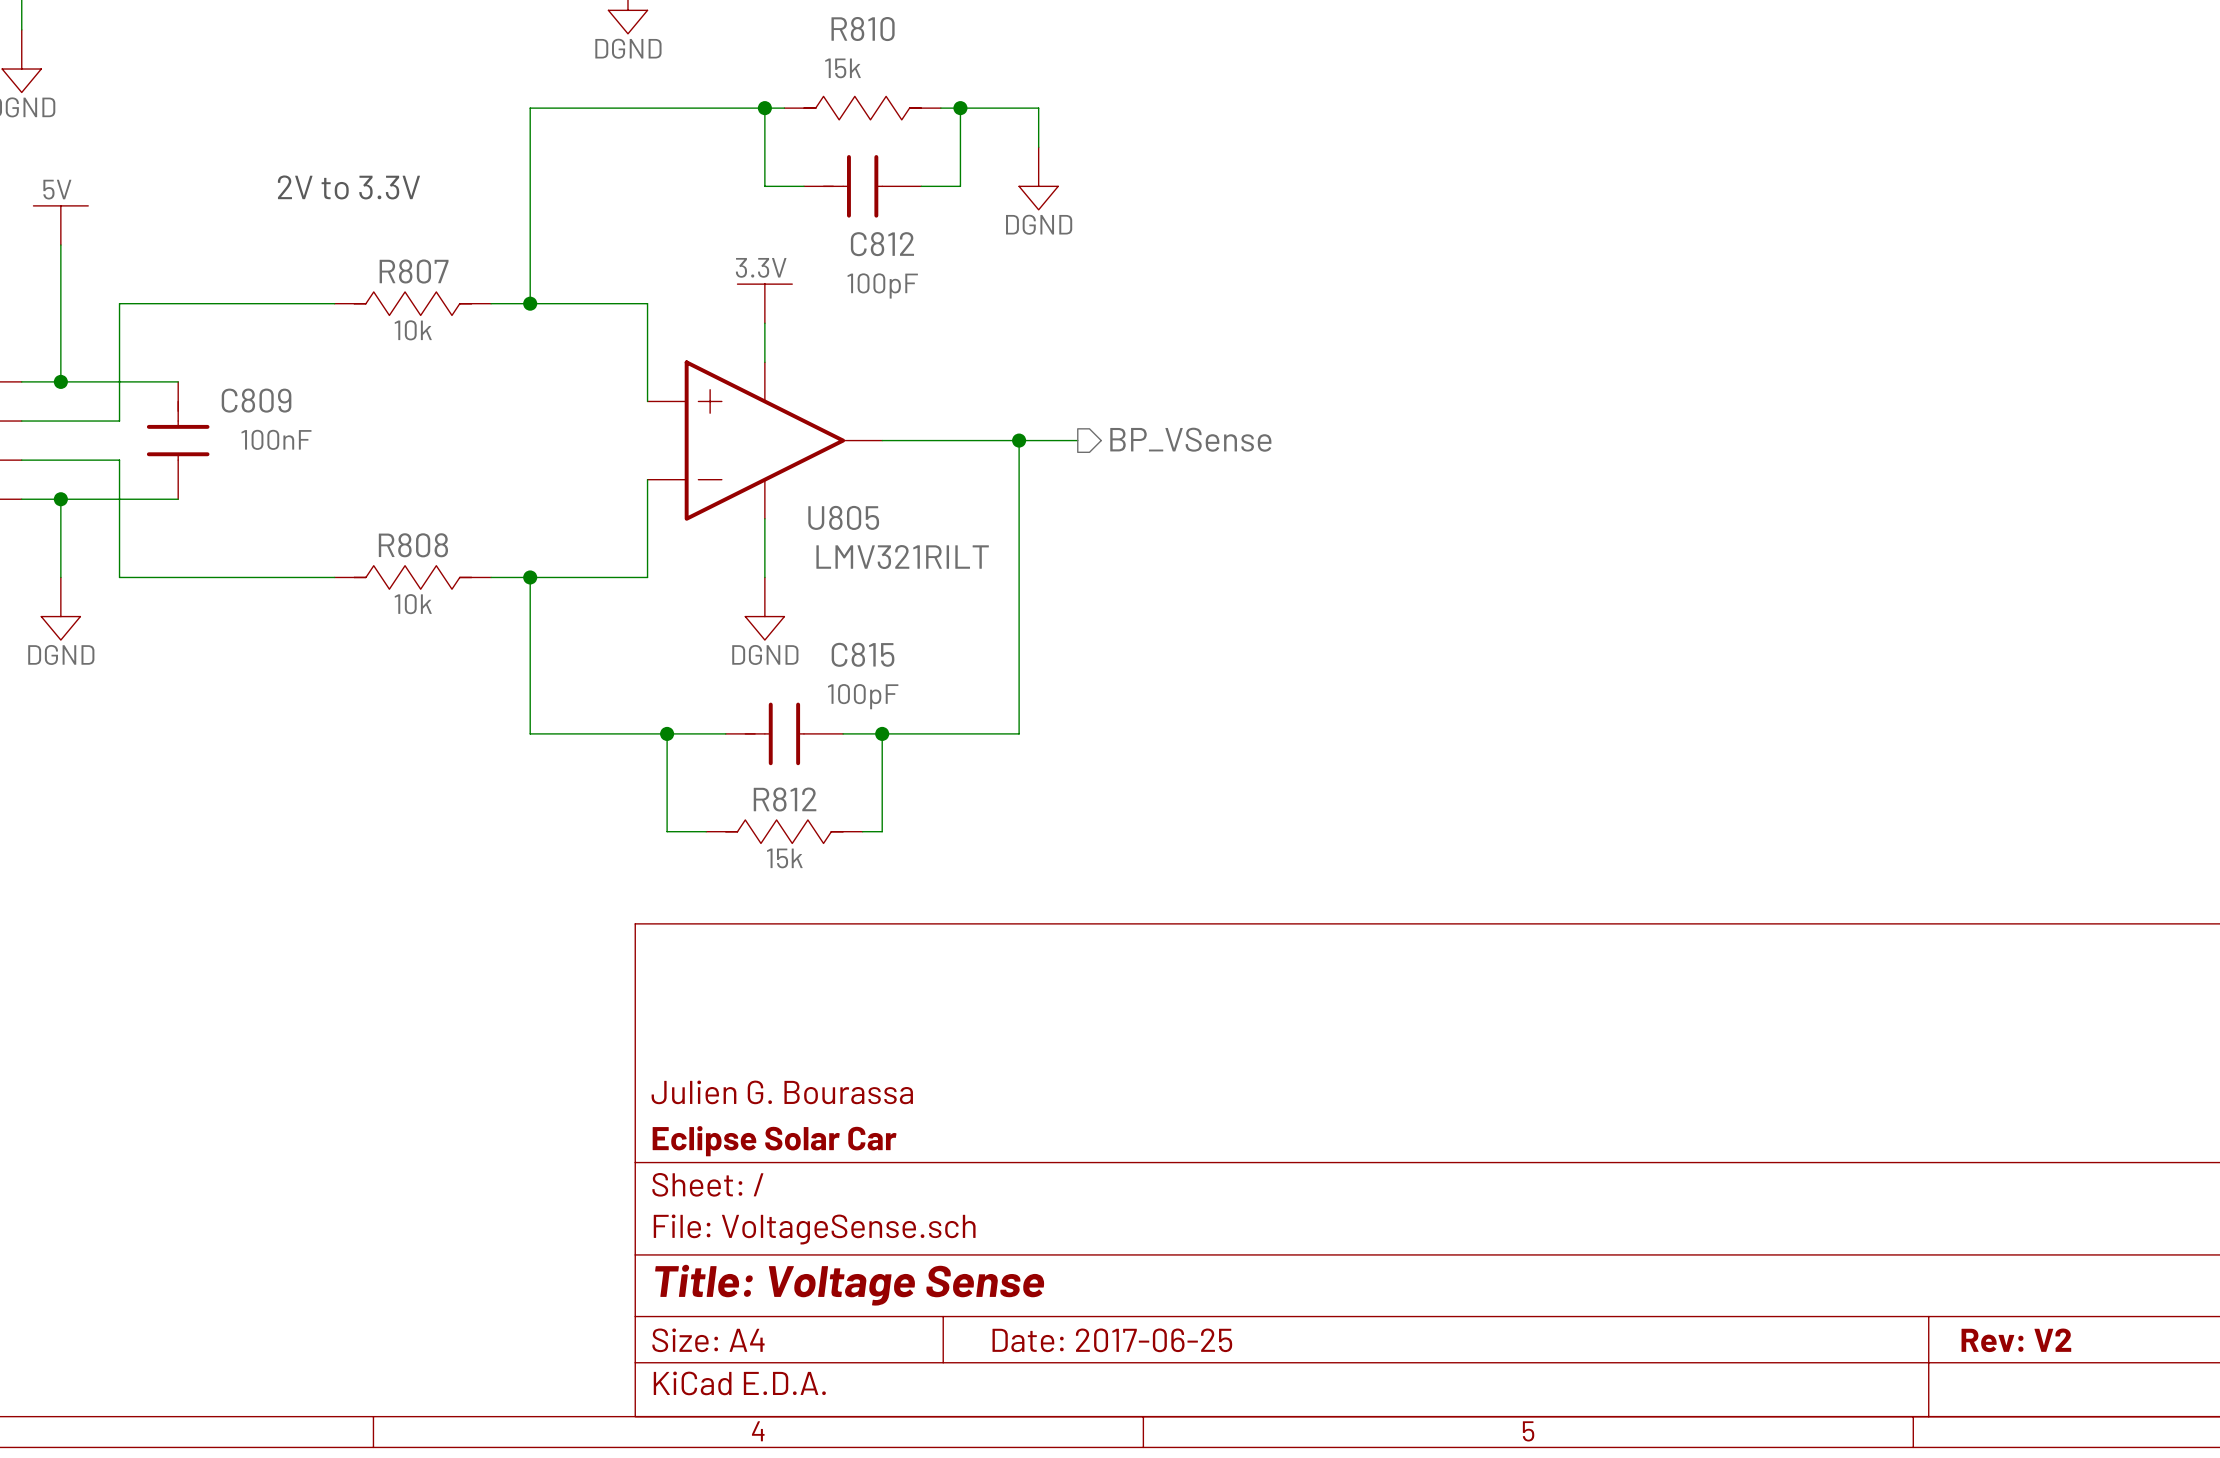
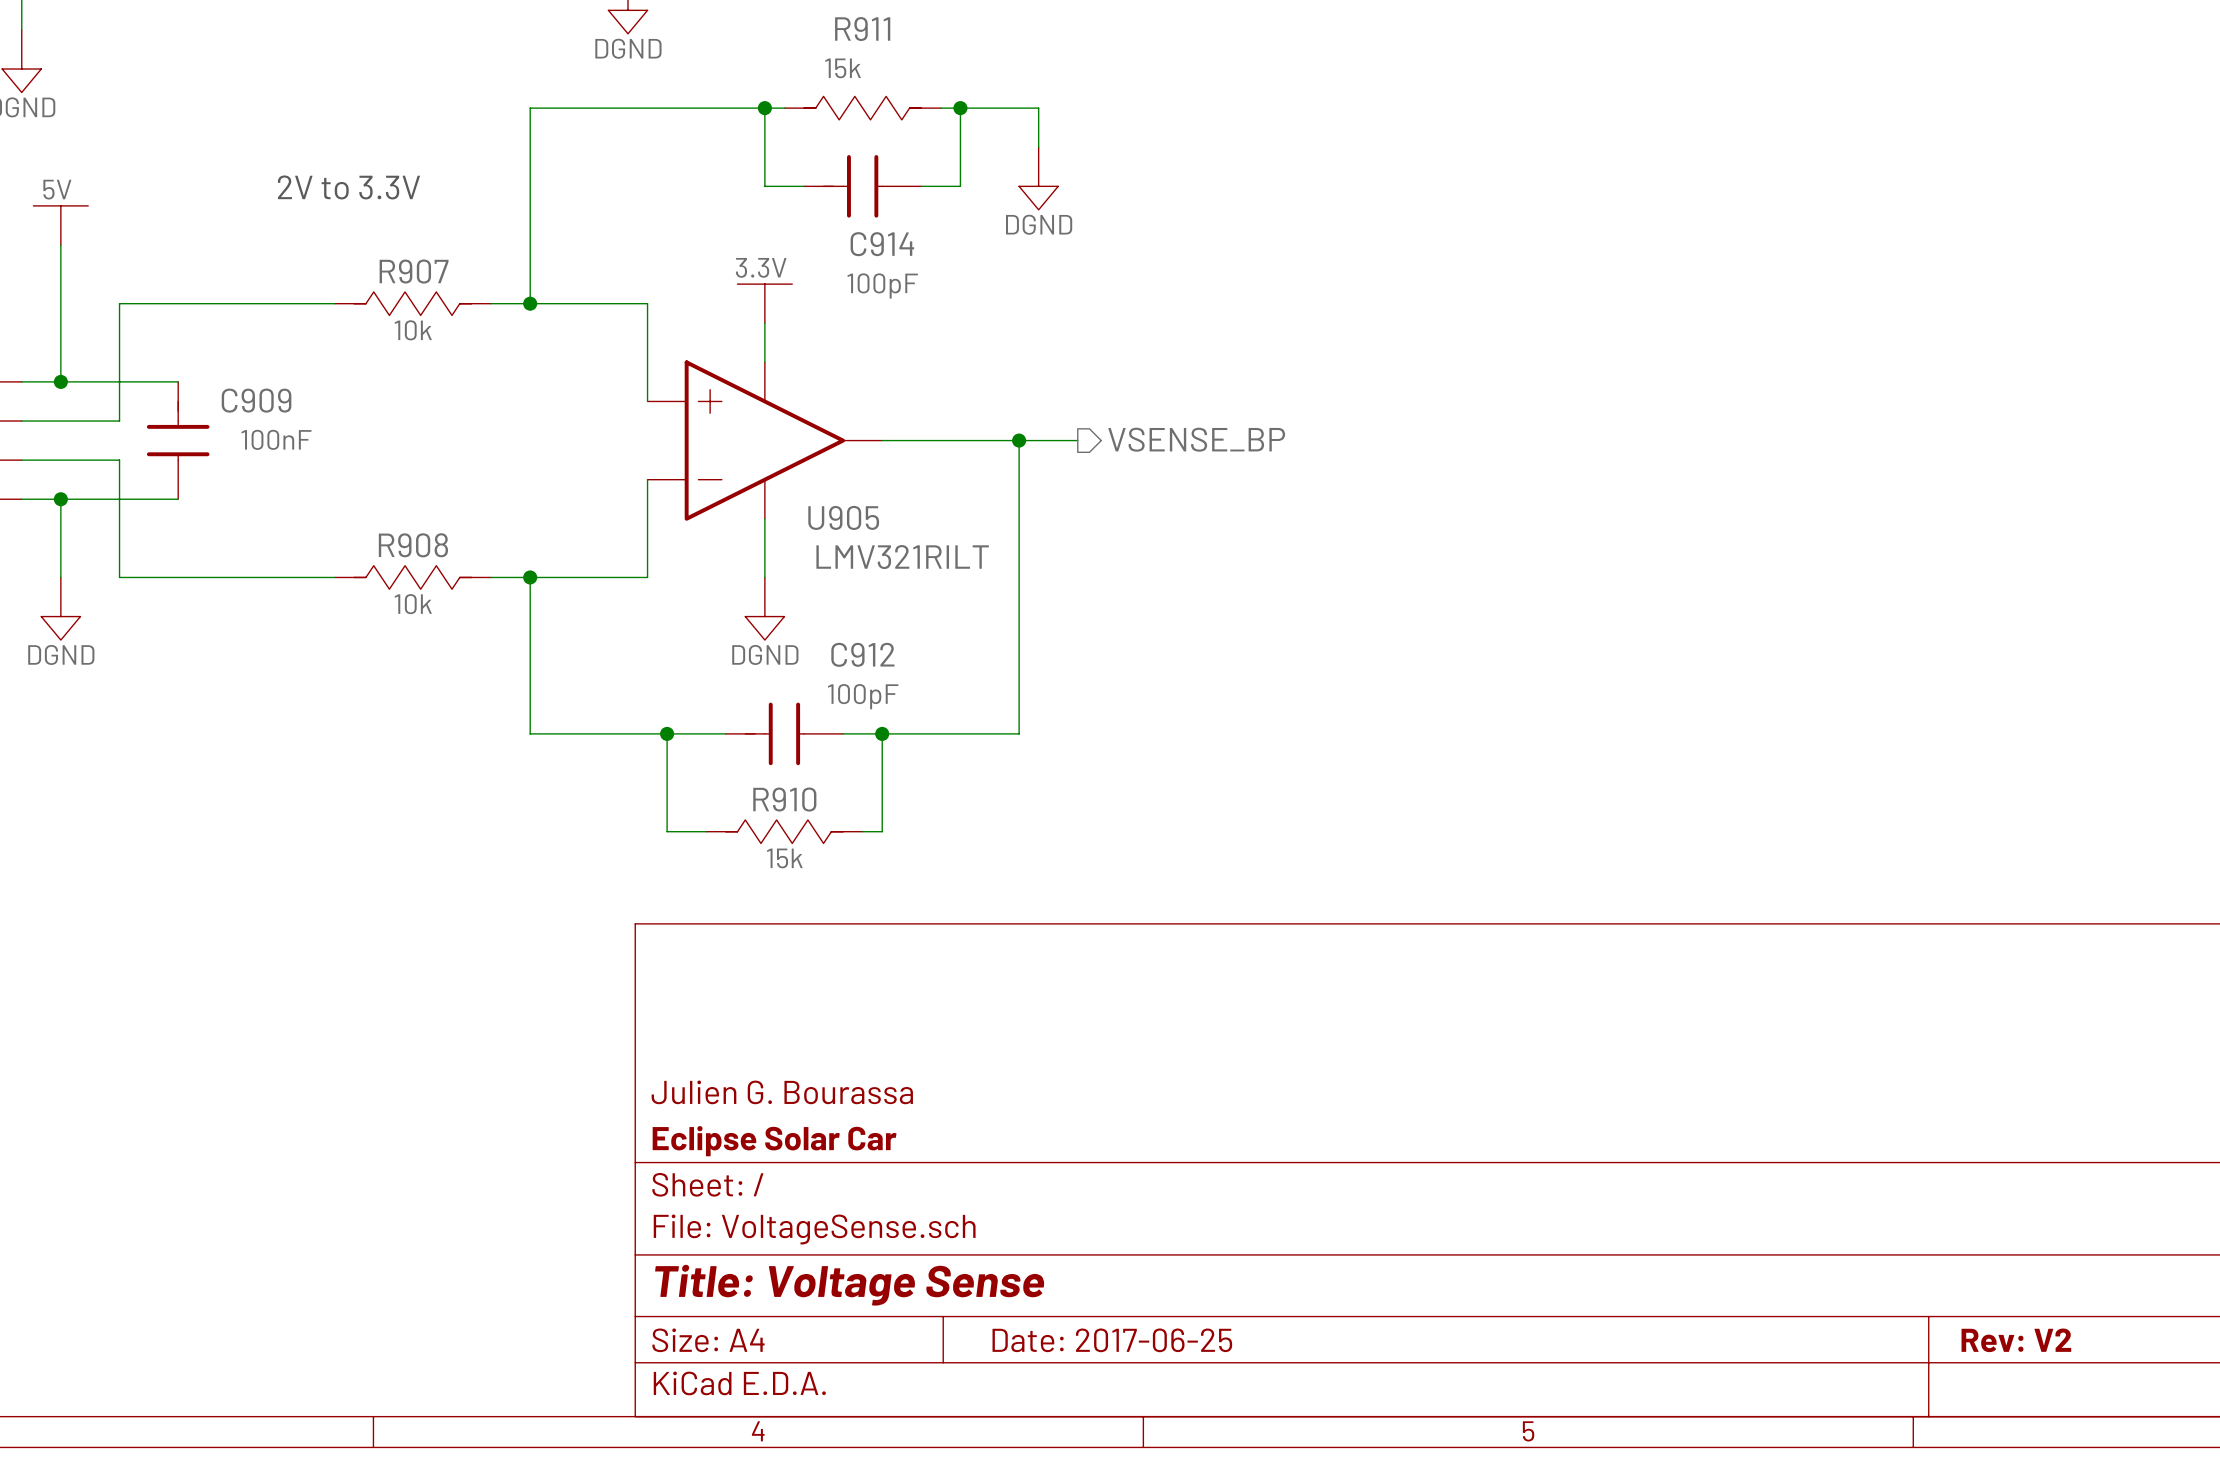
R810 name: R810 (863, 29) -> R911 (862, 29)
C812 name: C812 (882, 244) -> C914 (882, 244)
R807 name: R807 (414, 271) -> R907 (414, 271)
C809 name: C809 (256, 400) -> C909 (256, 400)
hierarchical label: BP_VSense (1190, 439) -> VSENSE_BP (1196, 439)
U805 name: U805 (843, 517) -> U905 (843, 517)
R808 name: R808 (413, 545) -> R908 (413, 545)
C815 name: C815 (863, 654) -> C912 (862, 654)
R812 name: R812 (785, 799) -> R910 (784, 799)

